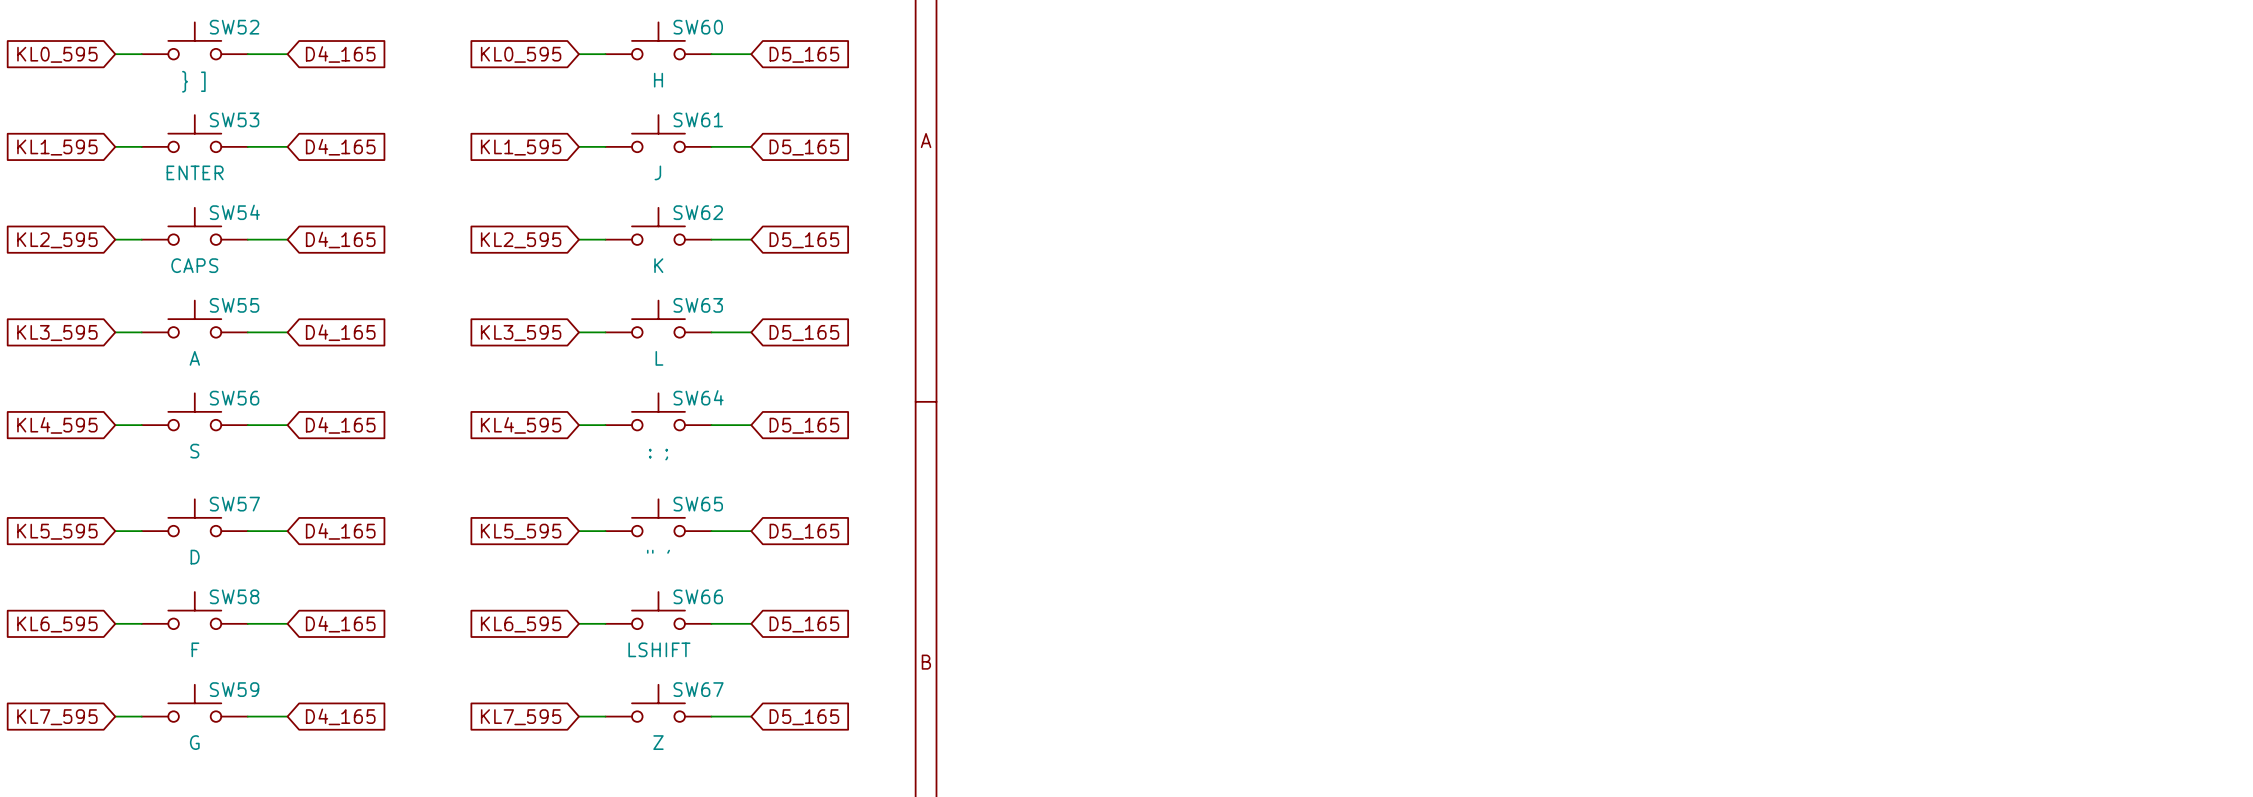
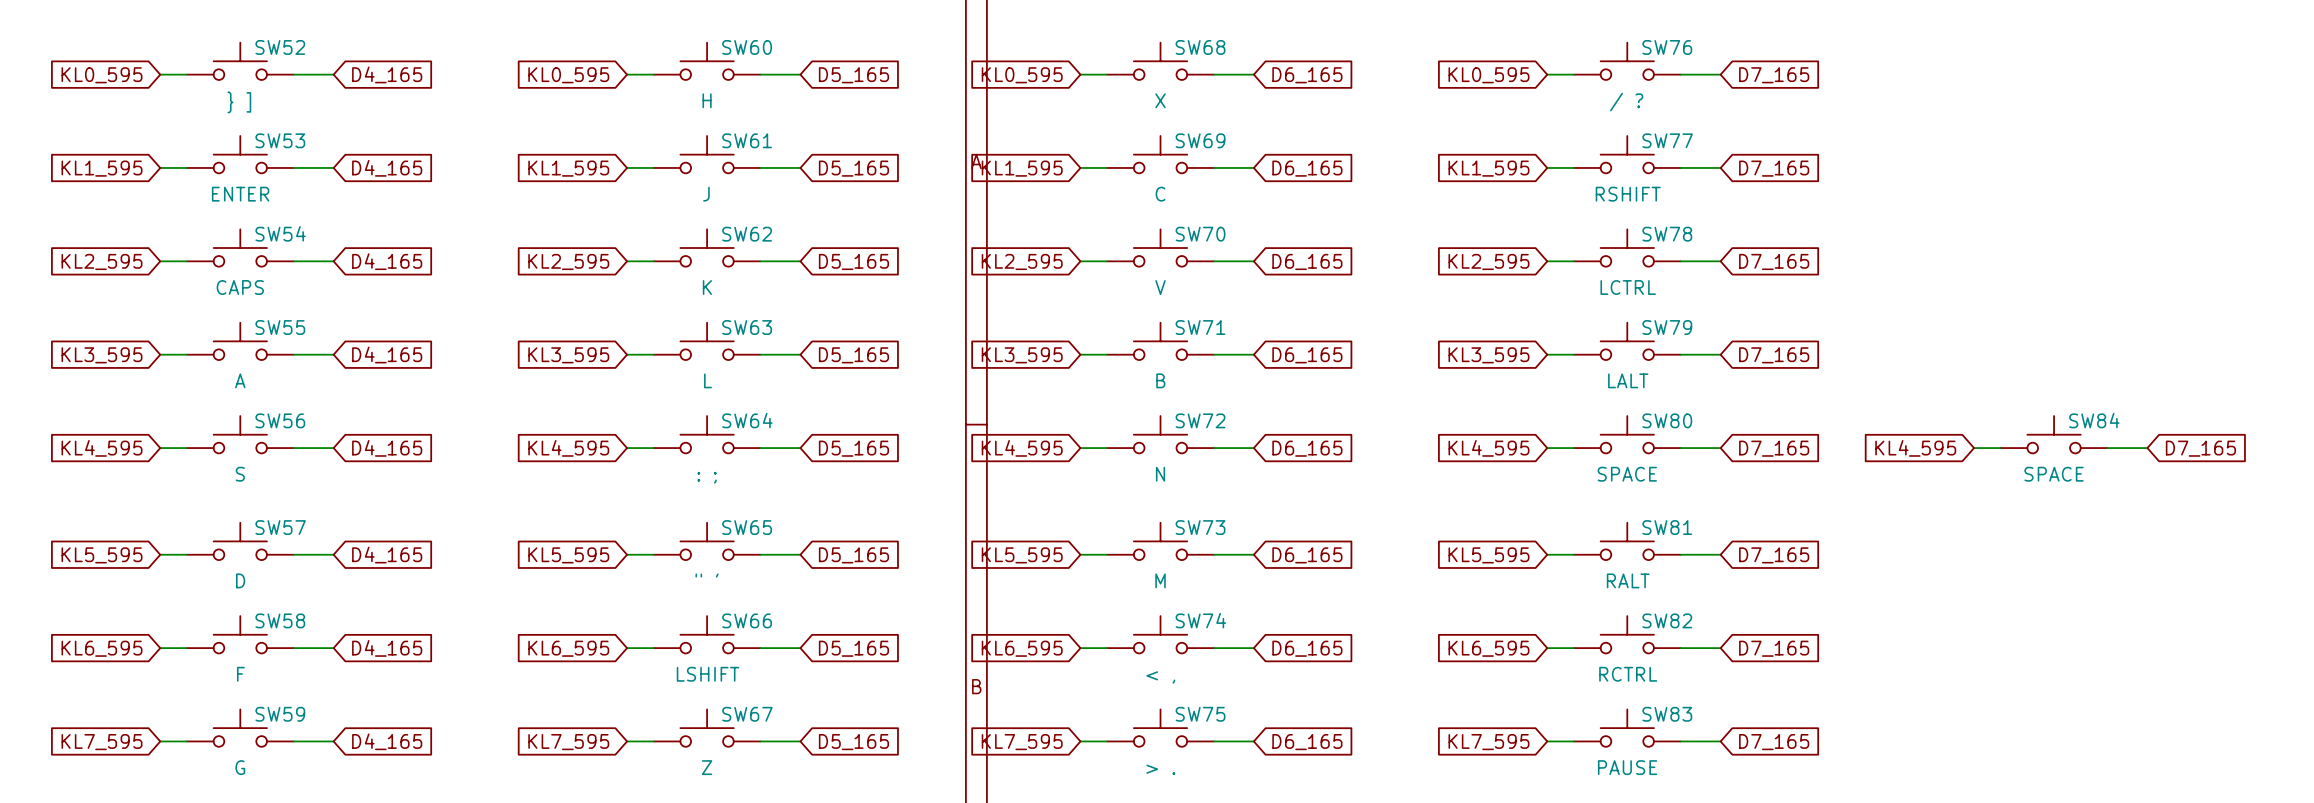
SW68: none -> X (1160, 61)
SW76: none -> / ? (1627, 61)
global label: none -> KL0_595 (1022, 75)
wire: none -> (1080, 74) (1107, 74)
wire: none -> (1213, 74) (1253, 74)
global label: none -> D6_165 (1307, 75)
global label: none -> KL0_595 (1488, 75)
wire: none -> (1547, 74) (1573, 74)
wire: none -> (1680, 74) (1720, 74)
global label: none -> D7_165 (1774, 75)
SW69: none -> C (1160, 154)
SW77: none -> RSHIFT (1627, 154)
wire: none -> (1080, 167) (1107, 167)
wire: none -> (1213, 167) (1253, 167)
wire: none -> (1547, 167) (1573, 167)
wire: none -> (1680, 167) (1720, 167)
global label: none -> KL1_595 (1022, 168)
global label: none -> D6_165 (1307, 168)
global label: none -> KL1_595 (1488, 168)
global label: none -> D7_165 (1774, 168)
SW70: none -> V (1160, 248)
SW78: none -> LCTRL (1627, 248)
wire: none -> (1080, 261) (1107, 261)
wire: none -> (1213, 261) (1253, 261)
wire: none -> (1547, 261) (1573, 261)
wire: none -> (1680, 261) (1720, 261)
global label: none -> KL2_595 (1022, 261)
global label: none -> D6_165 (1307, 261)
global label: none -> KL2_595 (1488, 261)
global label: none -> D7_165 (1774, 261)
SW71: none -> B (1160, 341)
SW79: none -> LALT (1627, 341)
wire: none -> (1080, 354) (1107, 354)
wire: none -> (1213, 354) (1253, 354)
wire: none -> (1547, 354) (1573, 354)
wire: none -> (1680, 354) (1720, 354)
global label: none -> KL3_595 (1022, 355)
global label: none -> D6_165 (1307, 355)
global label: none -> KL3_595 (1488, 355)
global label: none -> D7_165 (1774, 355)
SW72: none -> N (1160, 434)
SW80: none -> SPACE (1627, 434)
SW84: none -> SPACE (2054, 434)
global label: none -> KL4_595 (1022, 448)
wire: none -> (1080, 448) (1107, 448)
wire: none -> (1213, 448) (1253, 448)
global label: none -> D6_165 (1307, 448)
global label: none -> KL4_595 (1488, 448)
wire: none -> (1547, 448) (1573, 448)
wire: none -> (1680, 448) (1720, 448)
global label: none -> D7_165 (1774, 448)
global label: none -> KL4_595 (1915, 448)
wire: none -> (1974, 448) (2000, 448)
wire: none -> (2107, 448) (2147, 448)
global label: none -> D7_165 (2200, 448)
SW73: none -> M (1160, 541)
SW81: none -> RALT (1627, 541)
global label: none -> KL5_595 (1022, 555)
wire: none -> (1080, 554) (1107, 554)
wire: none -> (1213, 554) (1253, 554)
global label: none -> D6_165 (1307, 555)
global label: none -> KL5_595 (1488, 555)
wire: none -> (1547, 554) (1573, 554)
wire: none -> (1680, 554) (1720, 554)
global label: none -> D7_165 (1774, 555)
SW74: none -> < , (1160, 634)
SW82: none -> RCTRL (1627, 634)
wire: none -> (1080, 648) (1107, 648)
wire: none -> (1213, 648) (1253, 648)
wire: none -> (1547, 648) (1573, 648)
wire: none -> (1680, 648) (1720, 648)
global label: none -> KL6_595 (1022, 648)
global label: none -> D6_165 (1307, 648)
global label: none -> KL6_595 (1488, 648)
global label: none -> D7_165 (1774, 648)
SW75: none -> > . (1160, 728)
SW83: none -> PAUSE (1627, 728)
wire: none -> (1080, 741) (1107, 741)
wire: none -> (1213, 741) (1253, 741)
wire: none -> (1547, 741) (1573, 741)
wire: none -> (1680, 741) (1720, 741)
global label: none -> KL7_595 (1022, 742)
global label: none -> D6_165 (1307, 742)
global label: none -> KL7_595 (1488, 742)
global label: none -> D7_165 (1774, 742)

